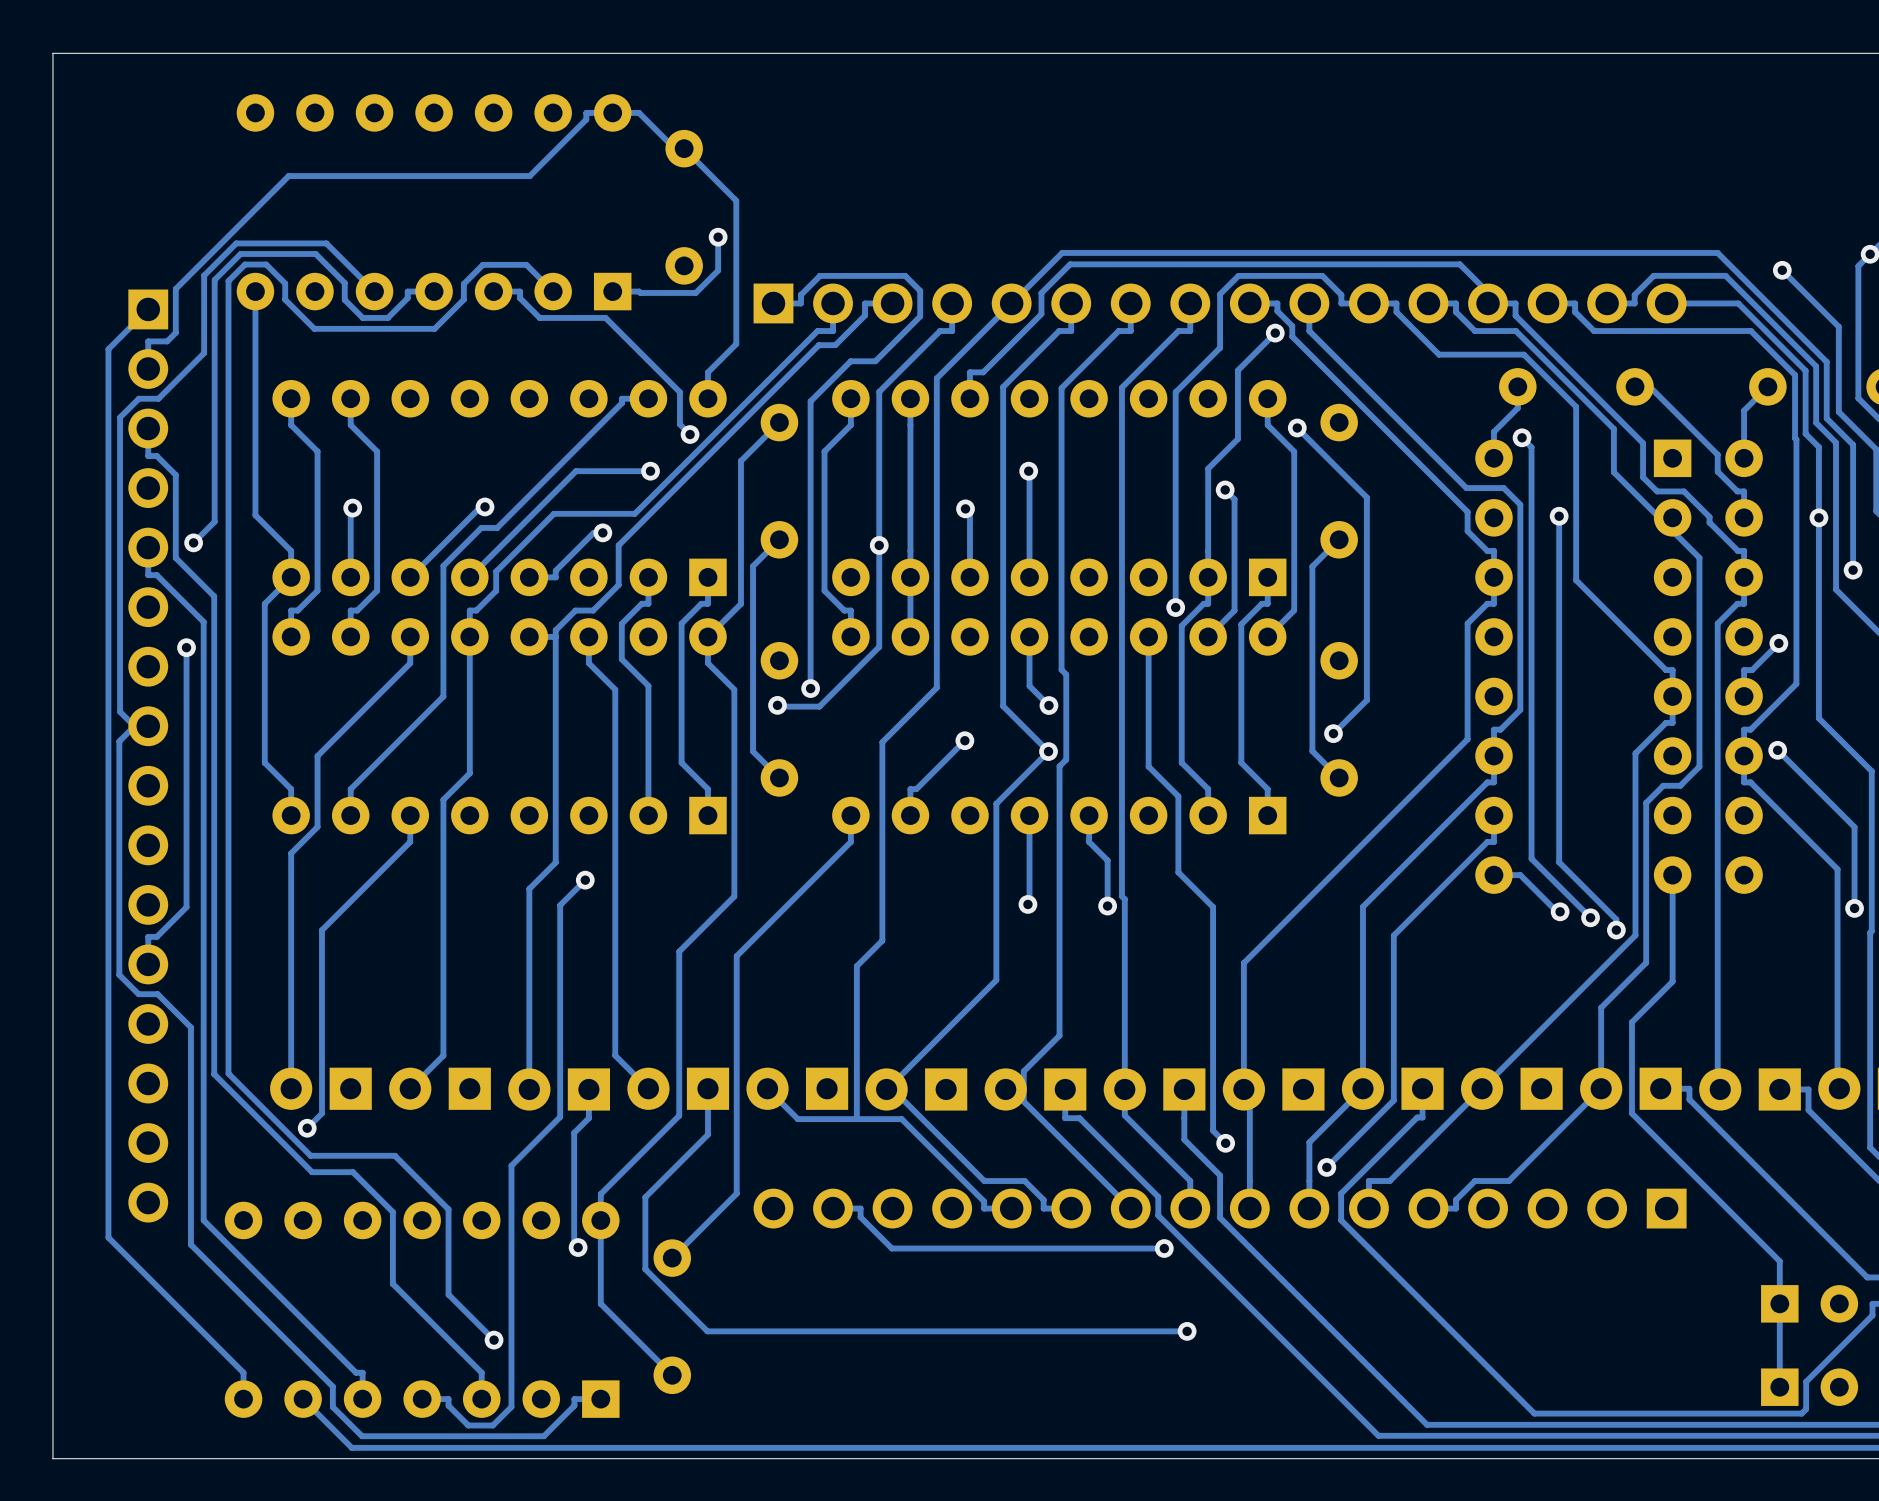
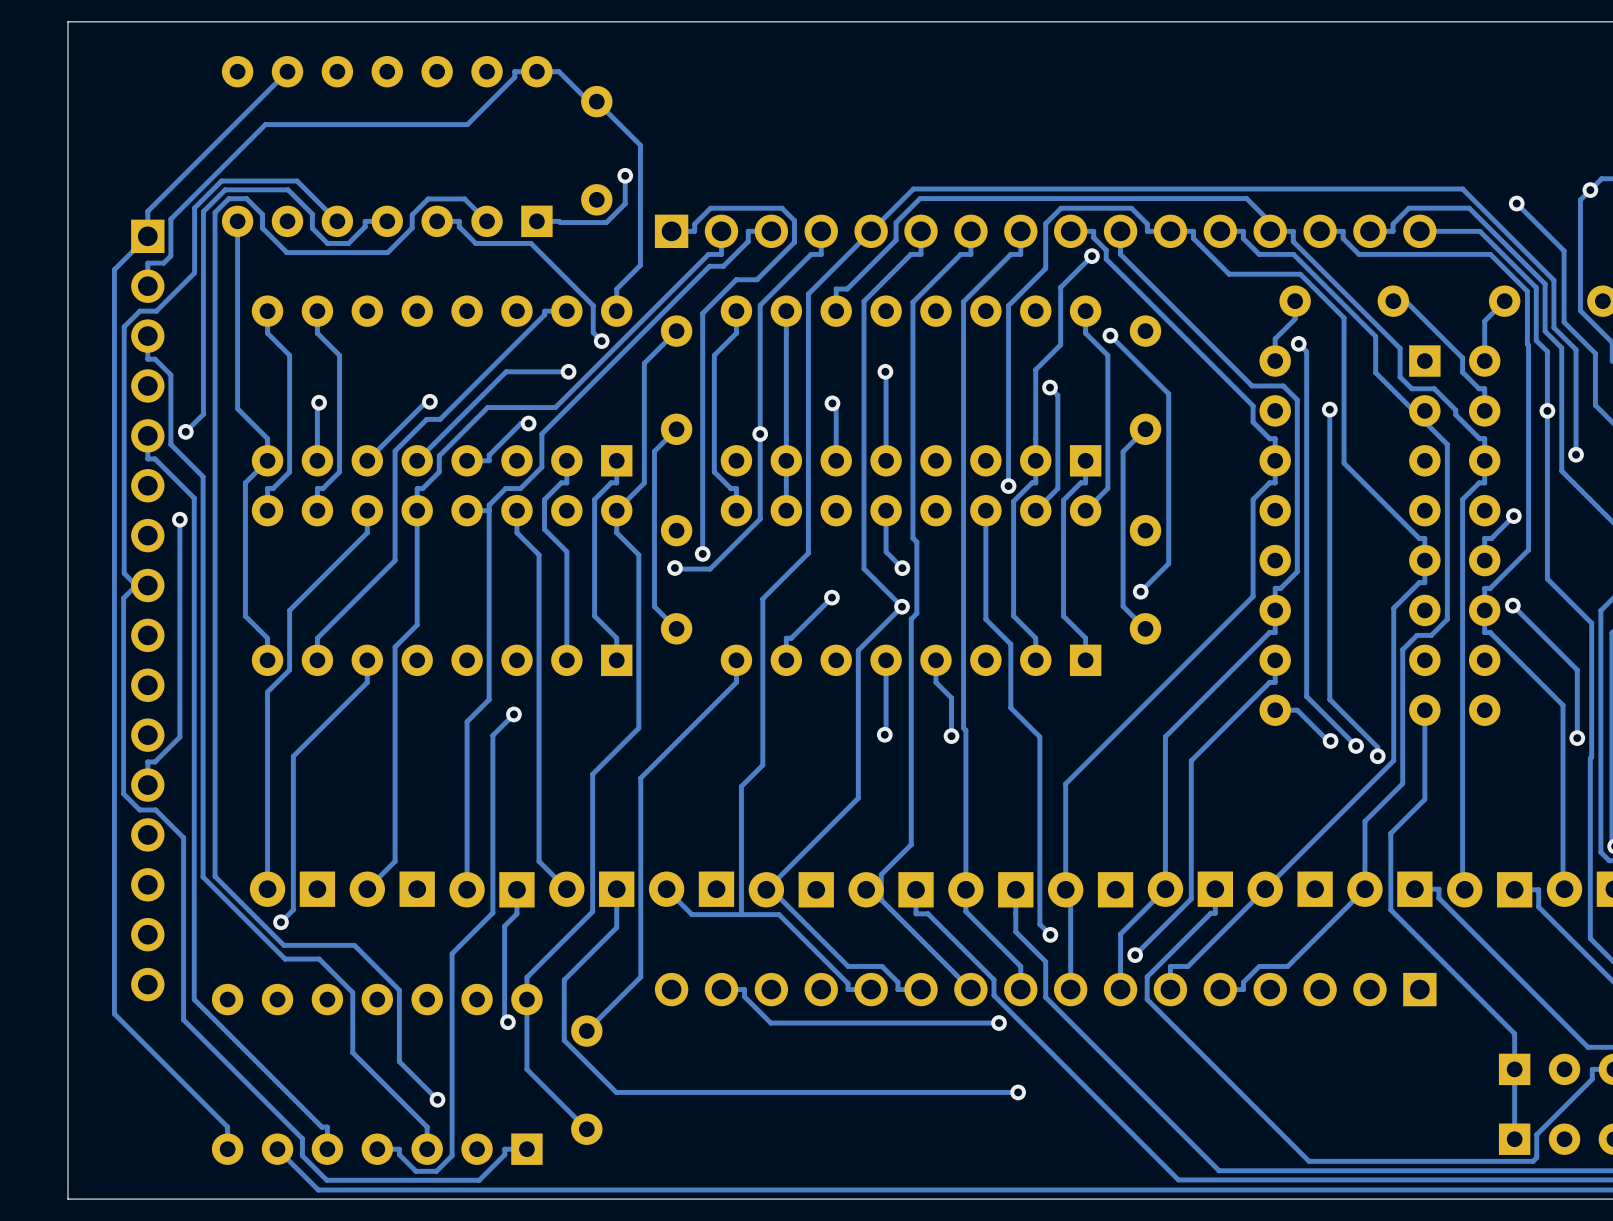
track: none -> (287, 71) (147, 211) (147, 236)

